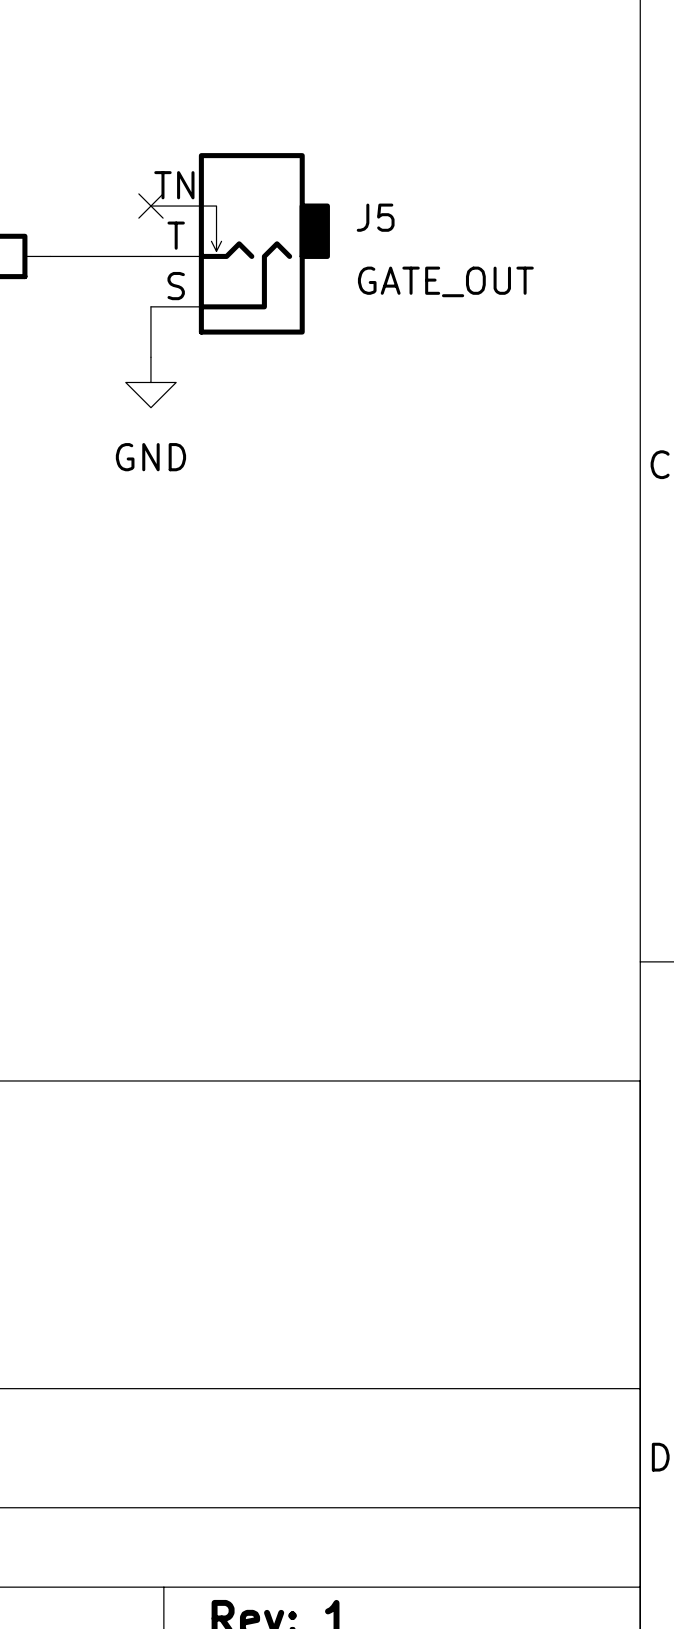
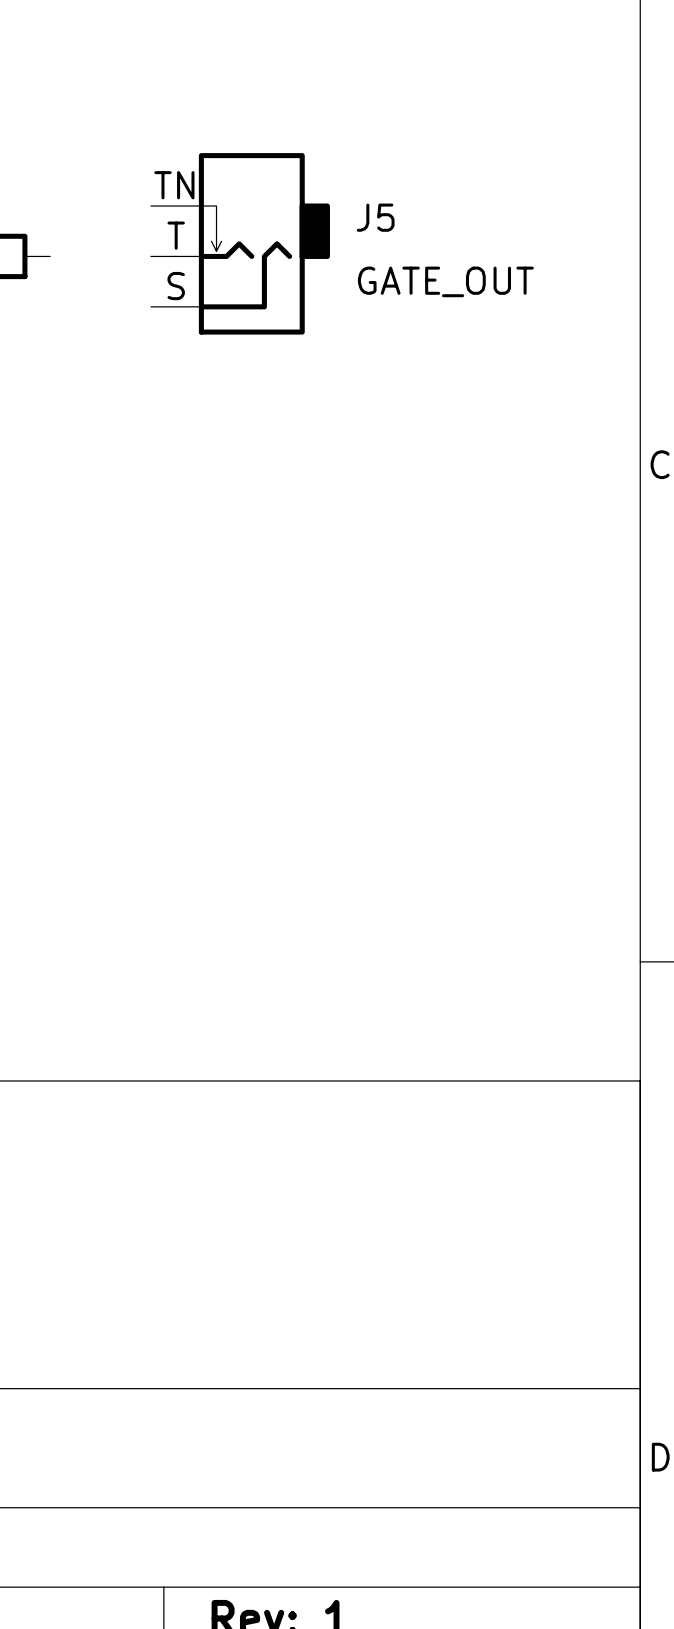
no-connect mark: (150, 206) -> none
wire: (50, 256) (150, 256) -> none
wire: (150, 306) (150, 357) -> none
power symbol: GND (150, 382) -> none

